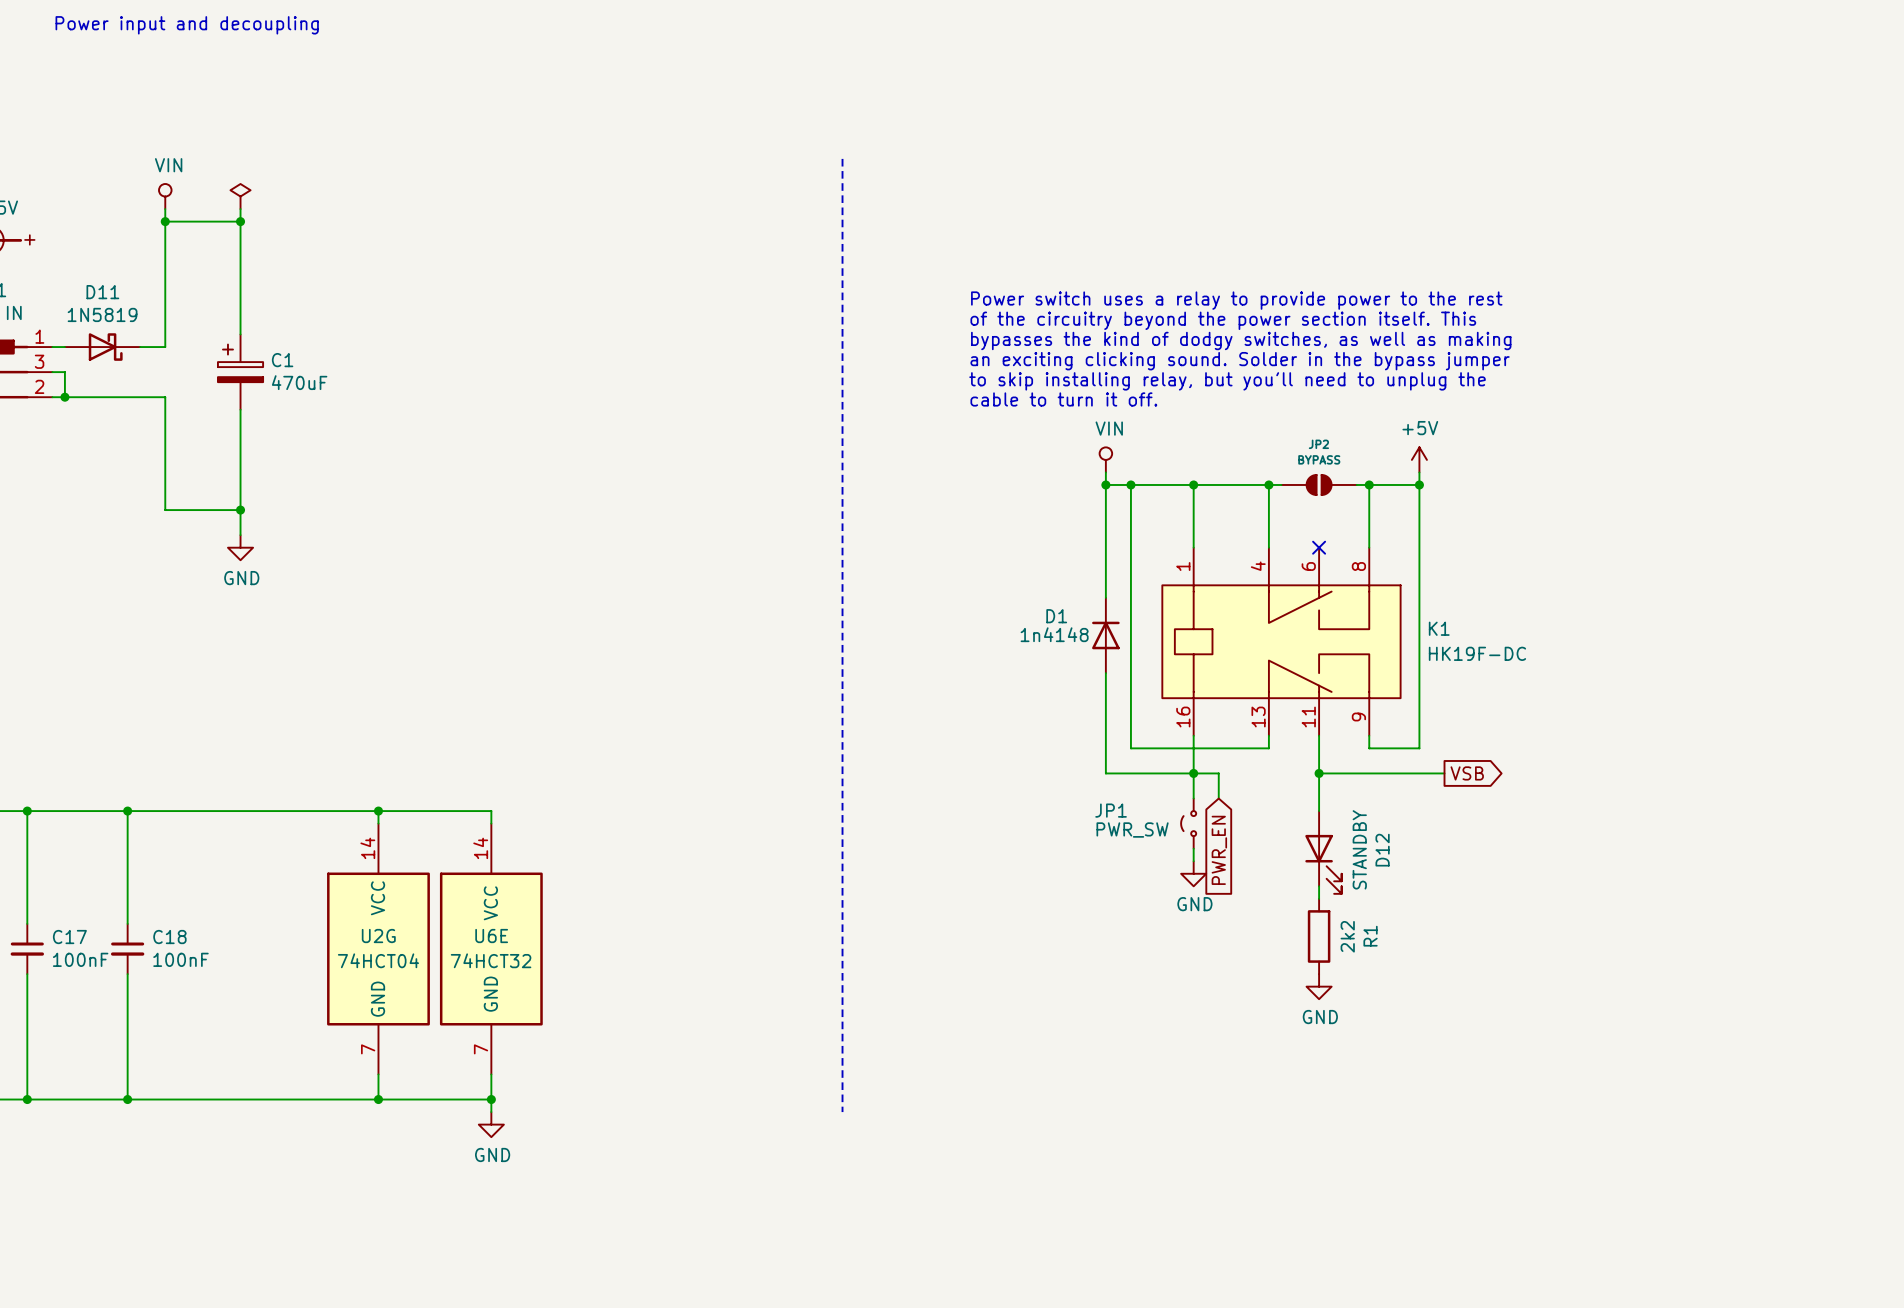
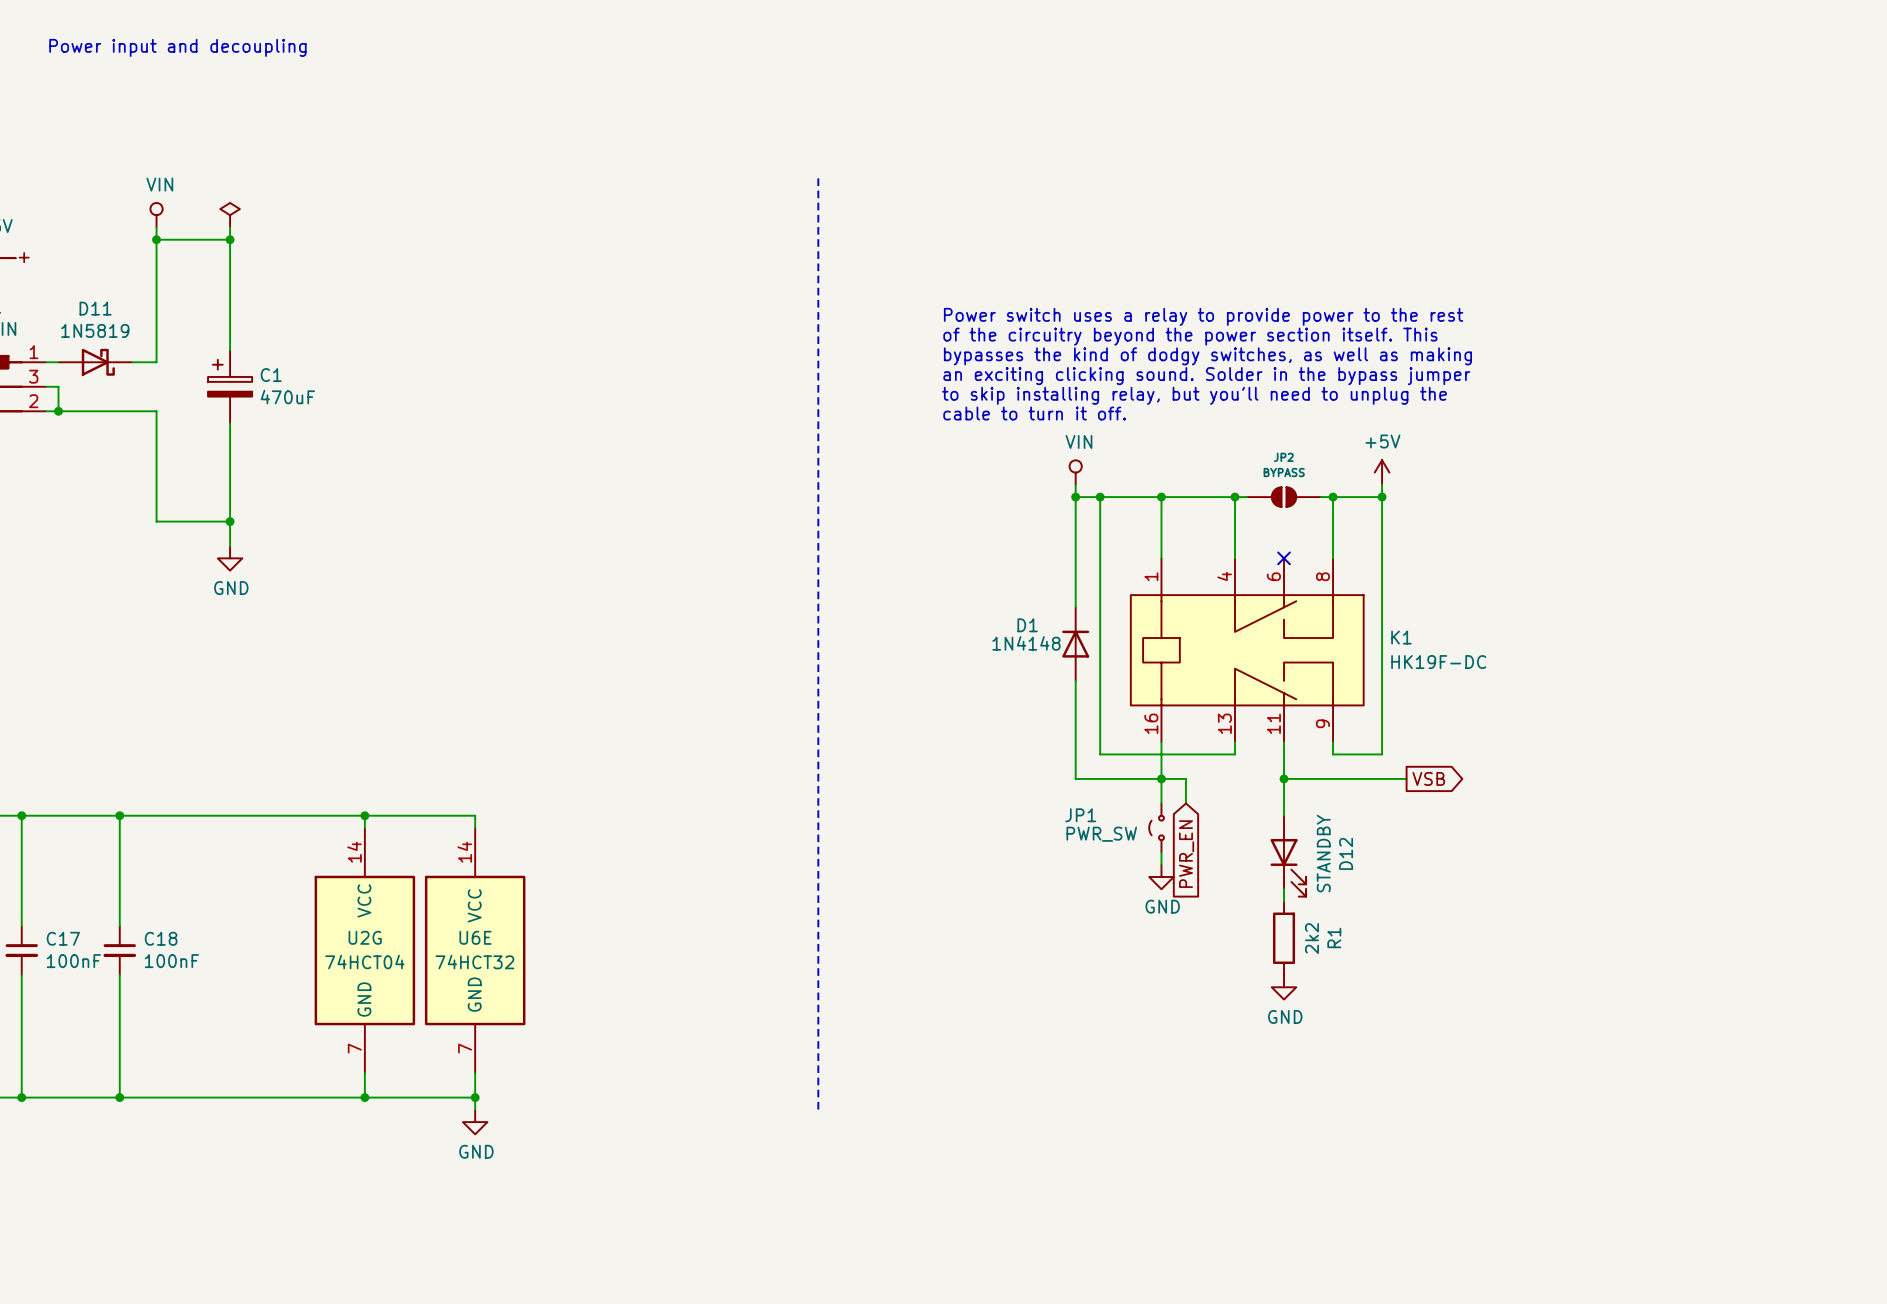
D1 value: 1n4148 (1054, 634) -> 1N4148 (1026, 643)

